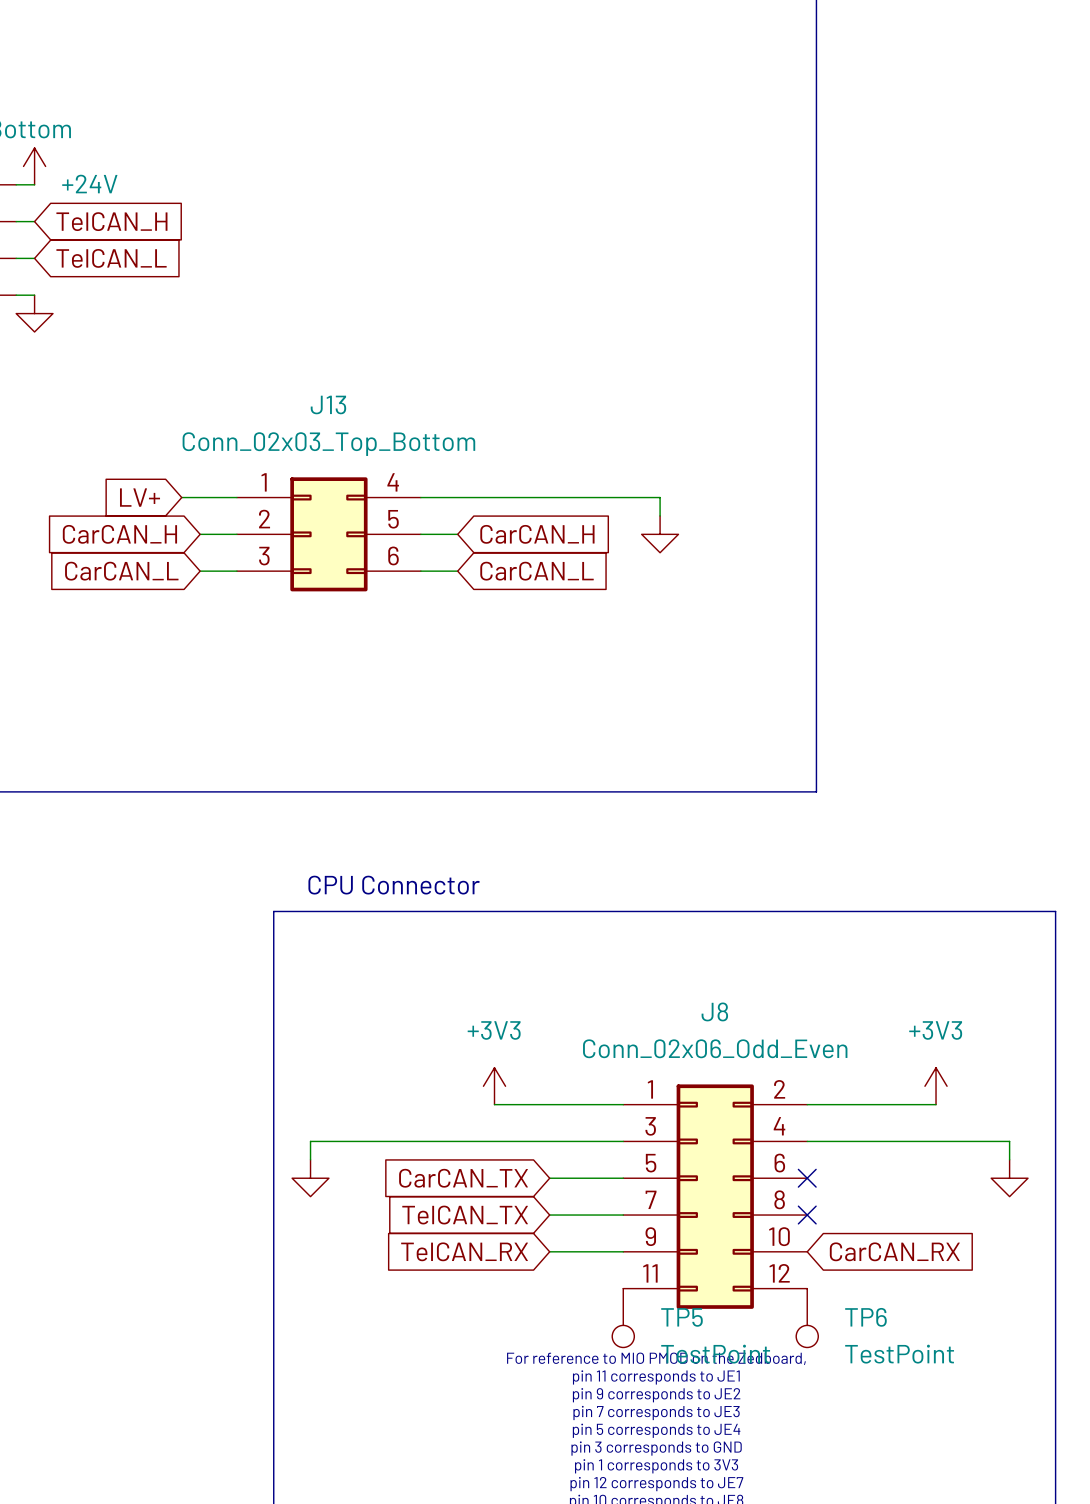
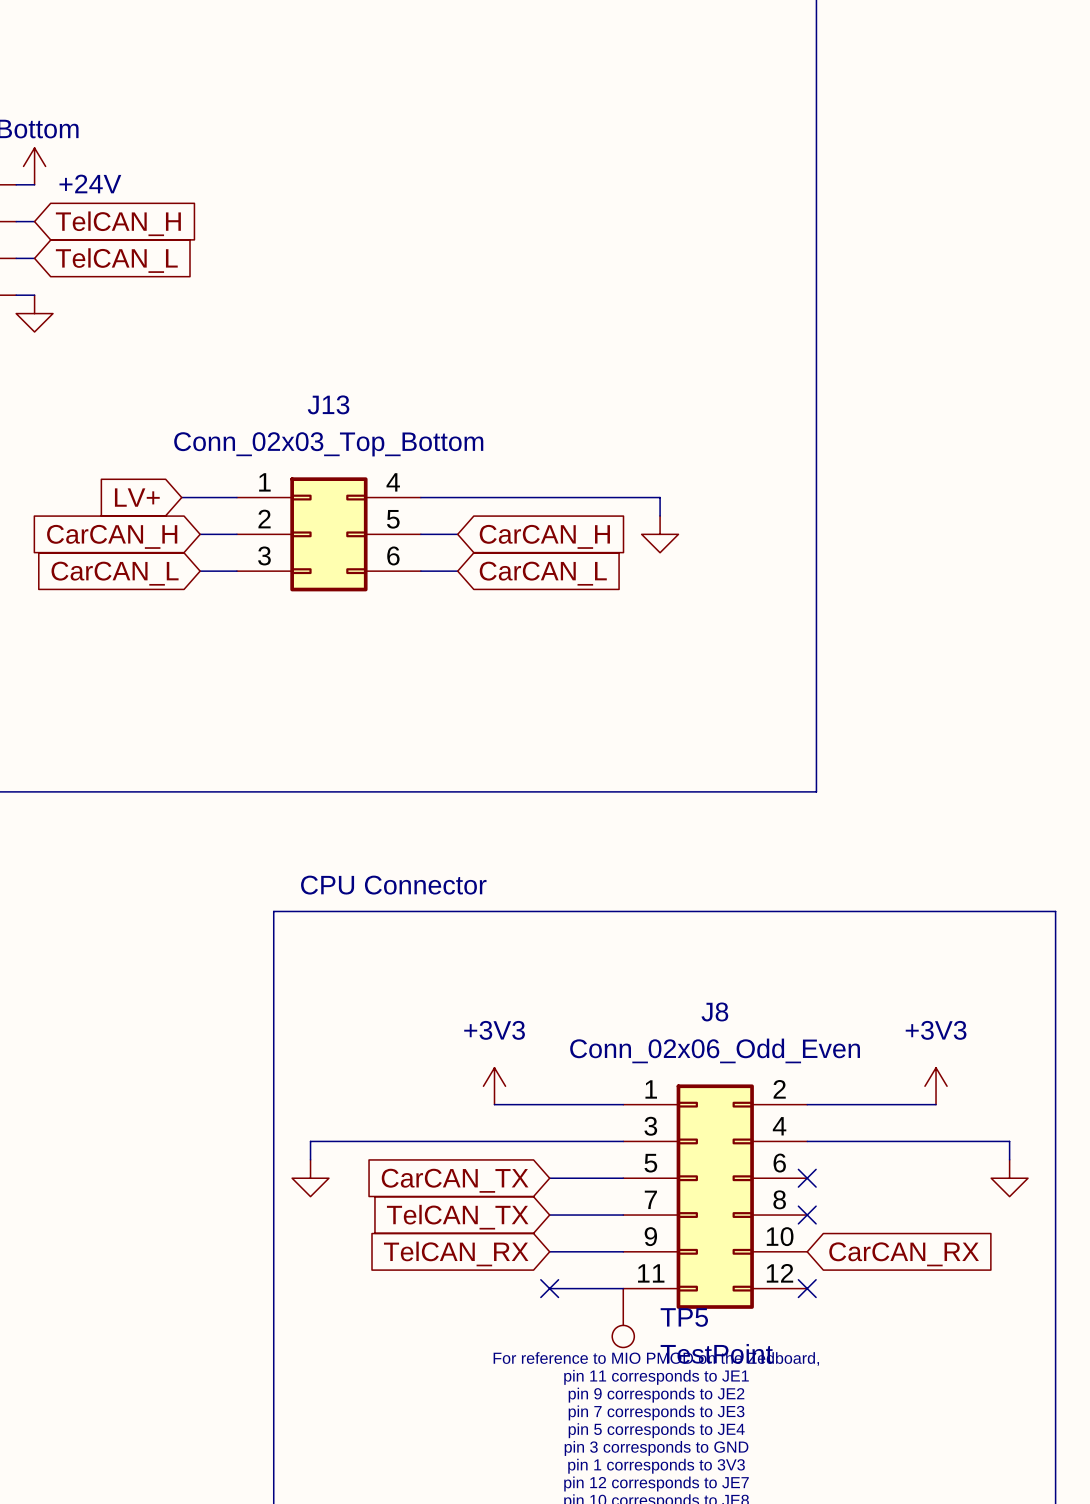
wire: none -> (549, 1288) (623, 1288)
no-connect mark: none -> (549, 1288)
no-connect mark: none -> (807, 1288)
TP6: TestPoint (807, 1318) -> none

